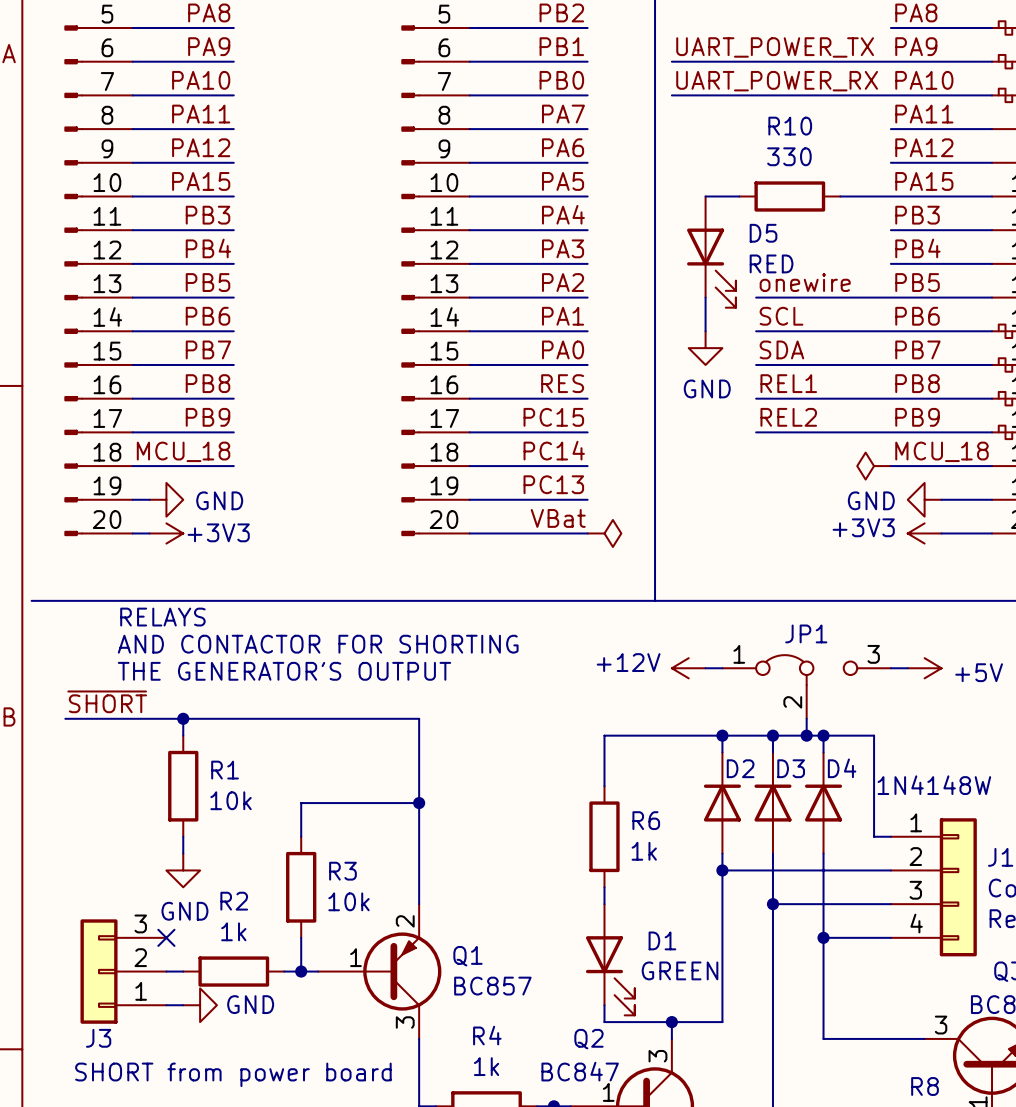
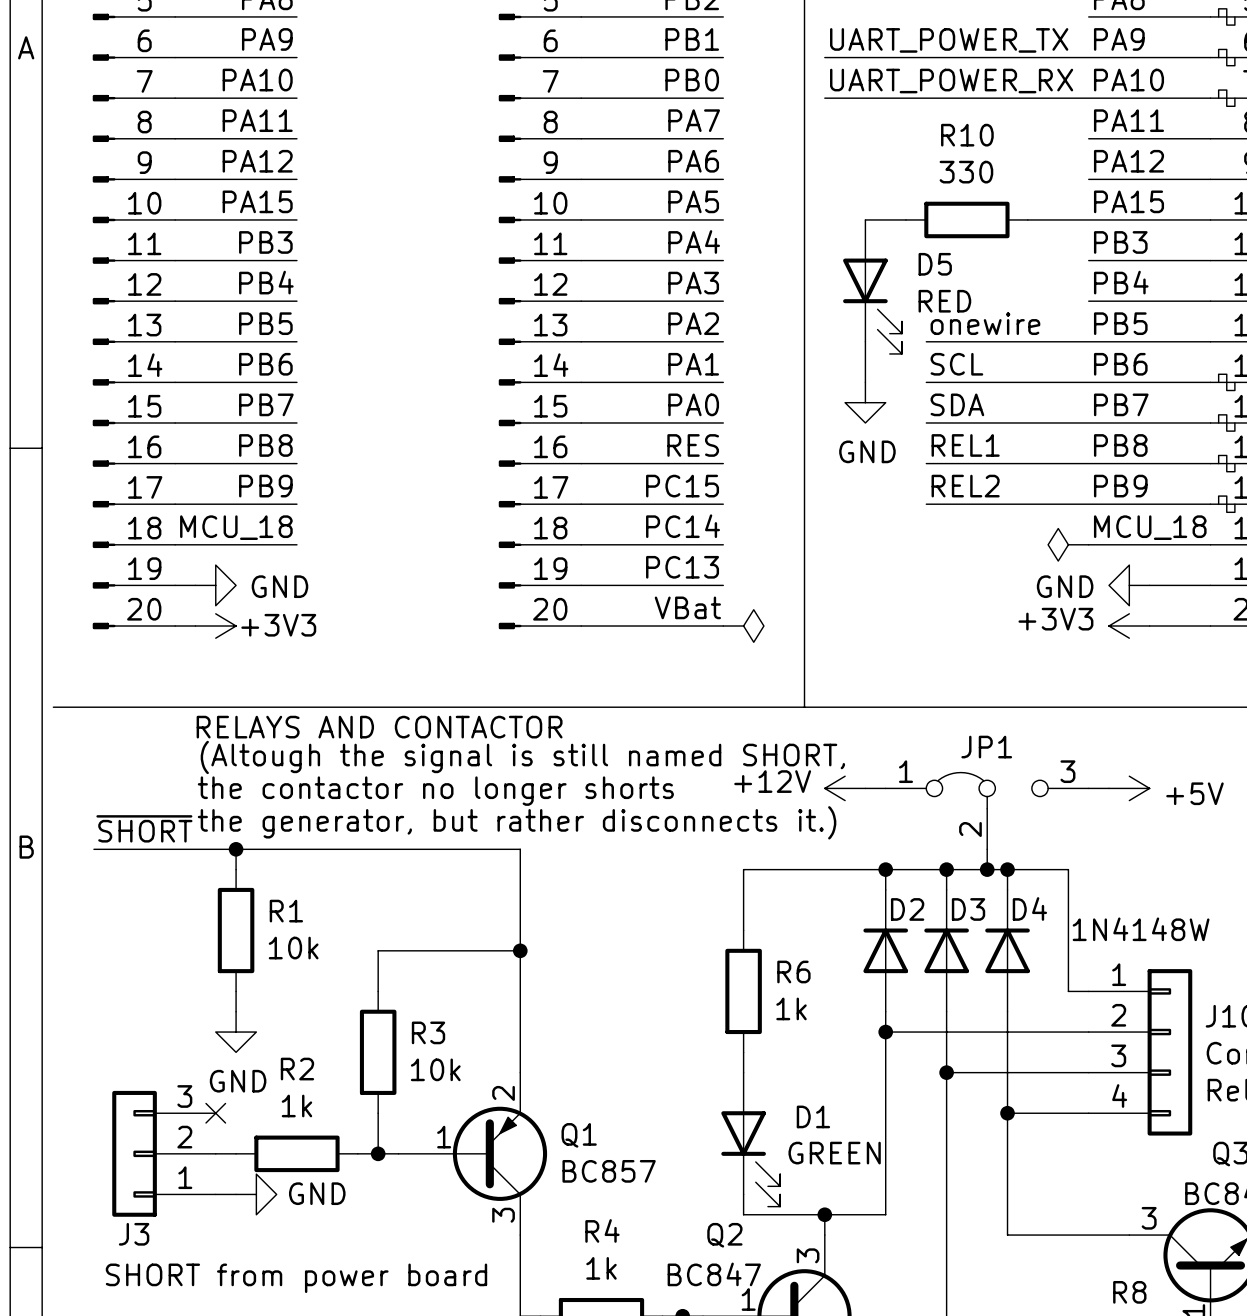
text: RELAYS (162, 617) -> none
text: none -> RELAYS AND CONTACTOR (379, 727)
text: none -> (Altough the signal is still named SHORT, (522, 757)
text: AND CONTACTOR FOR SHORTING (318, 644) -> none
text: none -> the contactor no longer shorts (435, 791)
text: THE GENERATOR'S OUTPUT (284, 671) -> none
text: none -> the generator, but rather disconnects it.) (517, 822)

